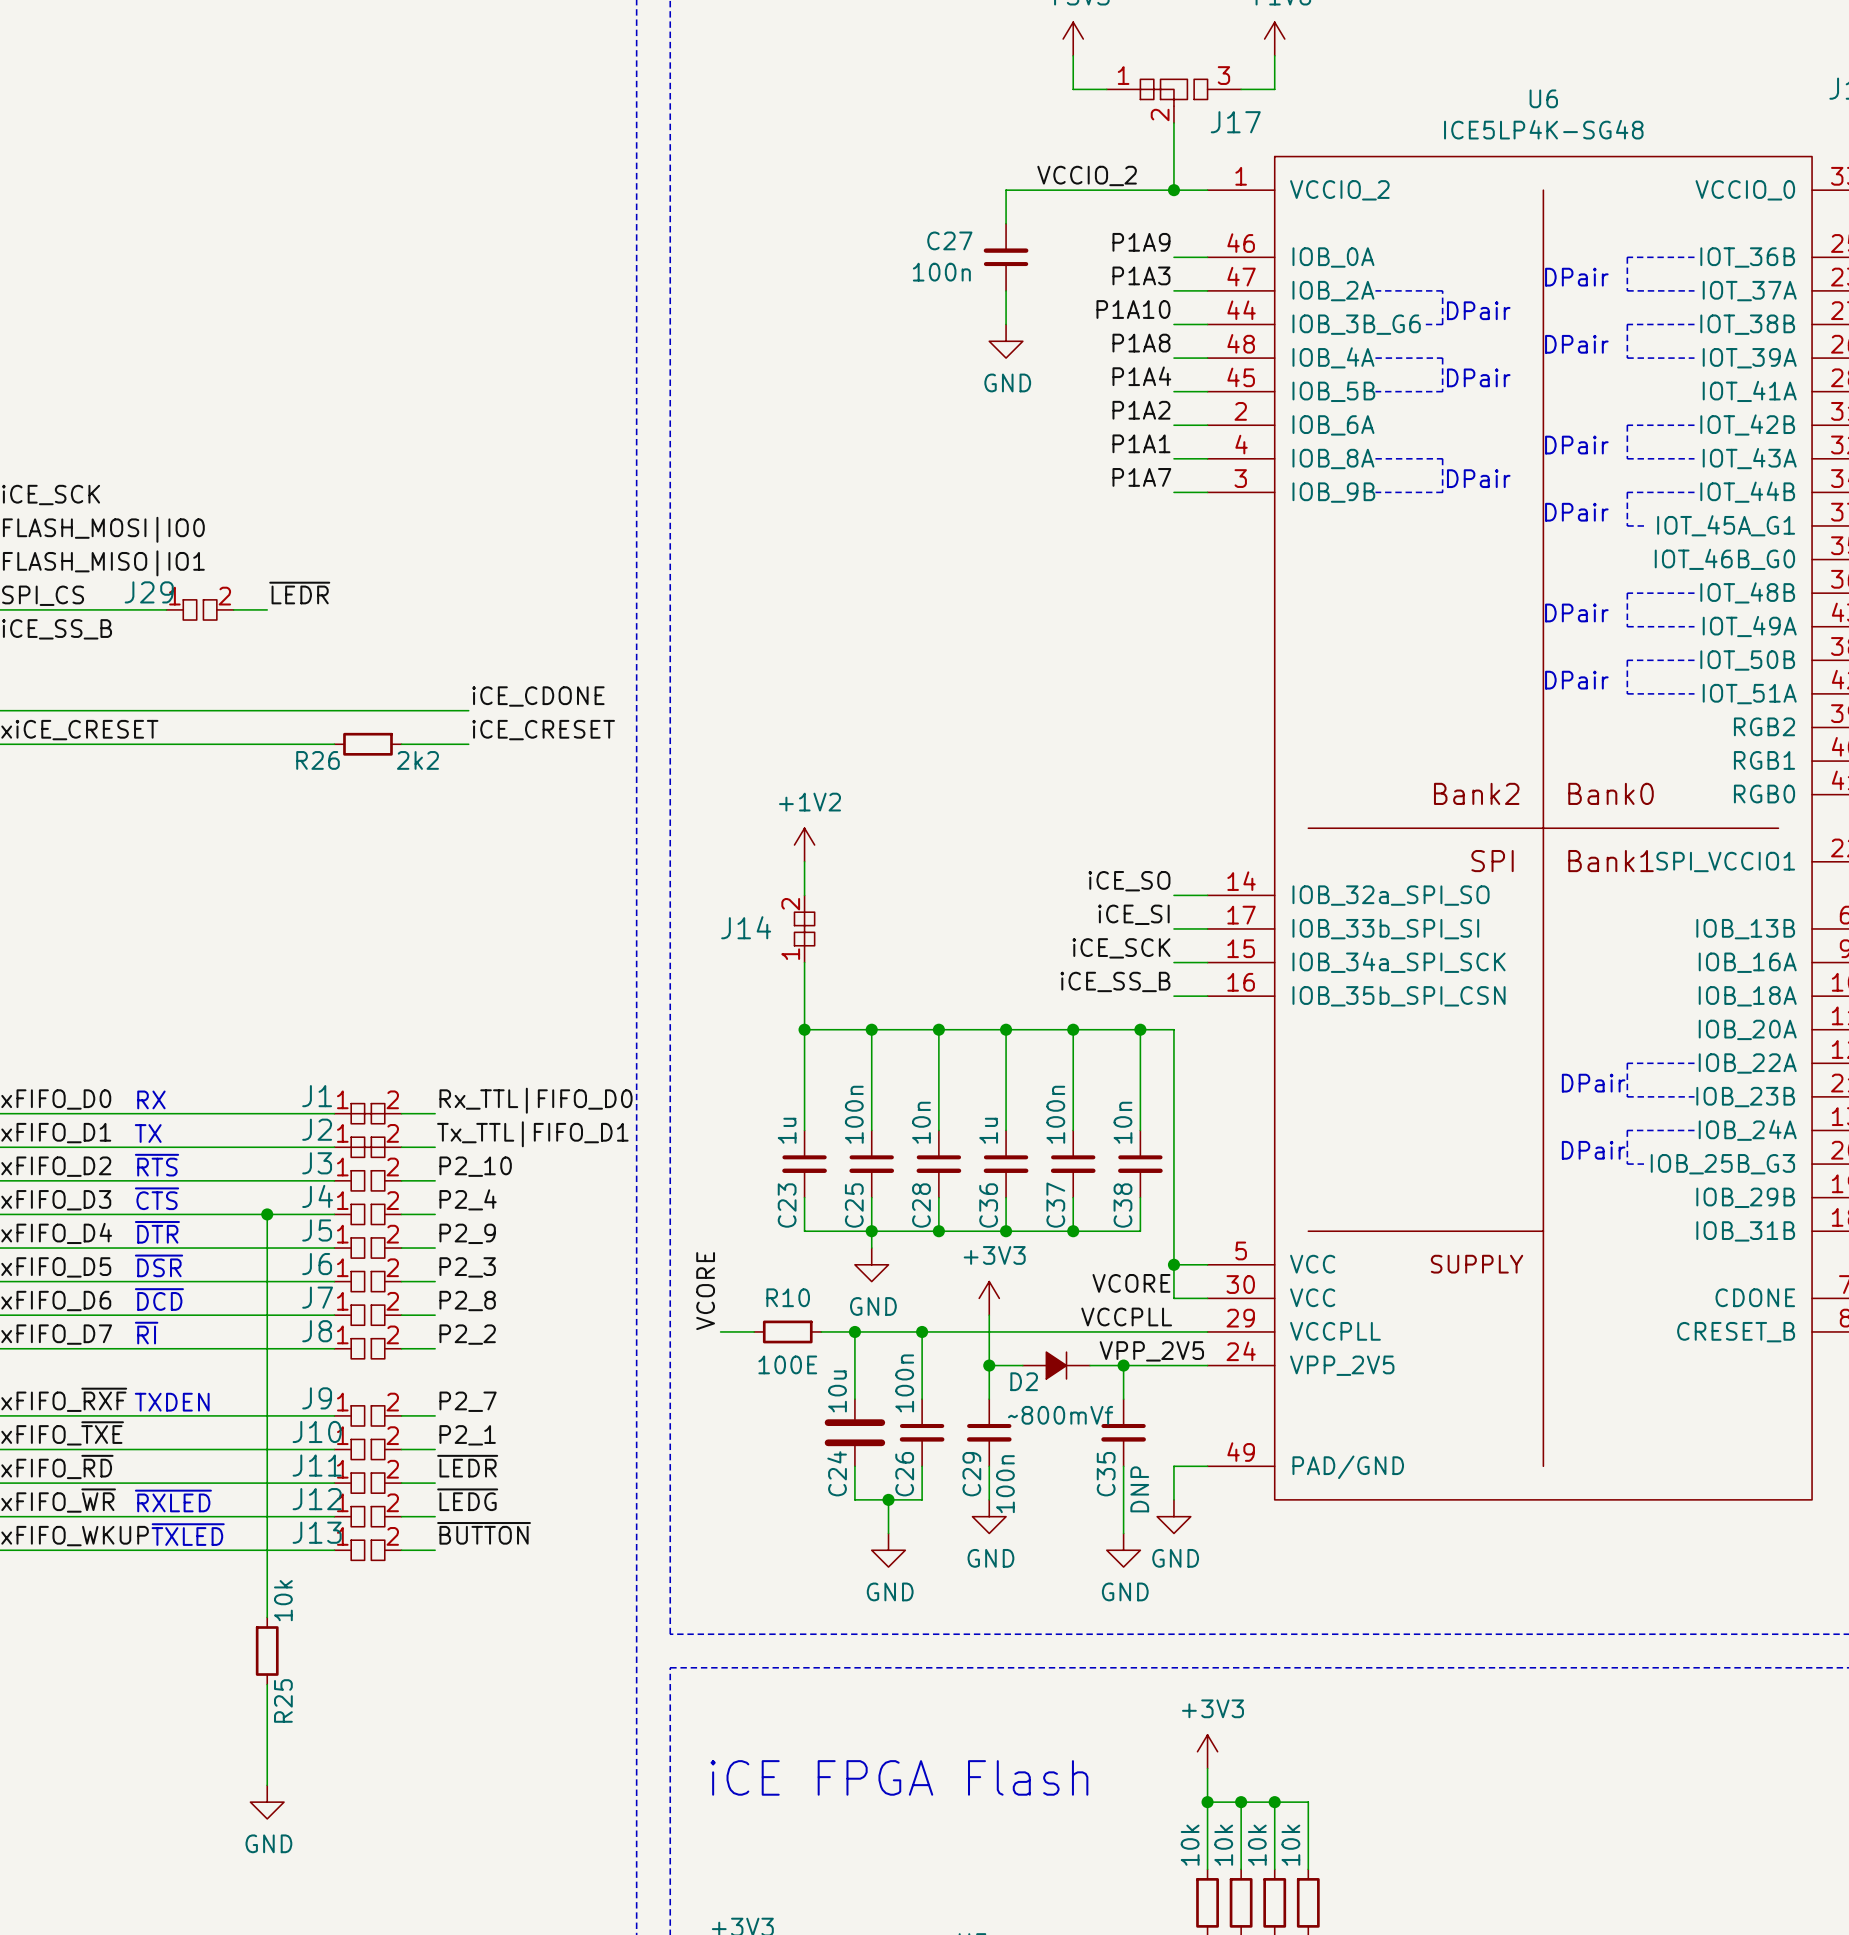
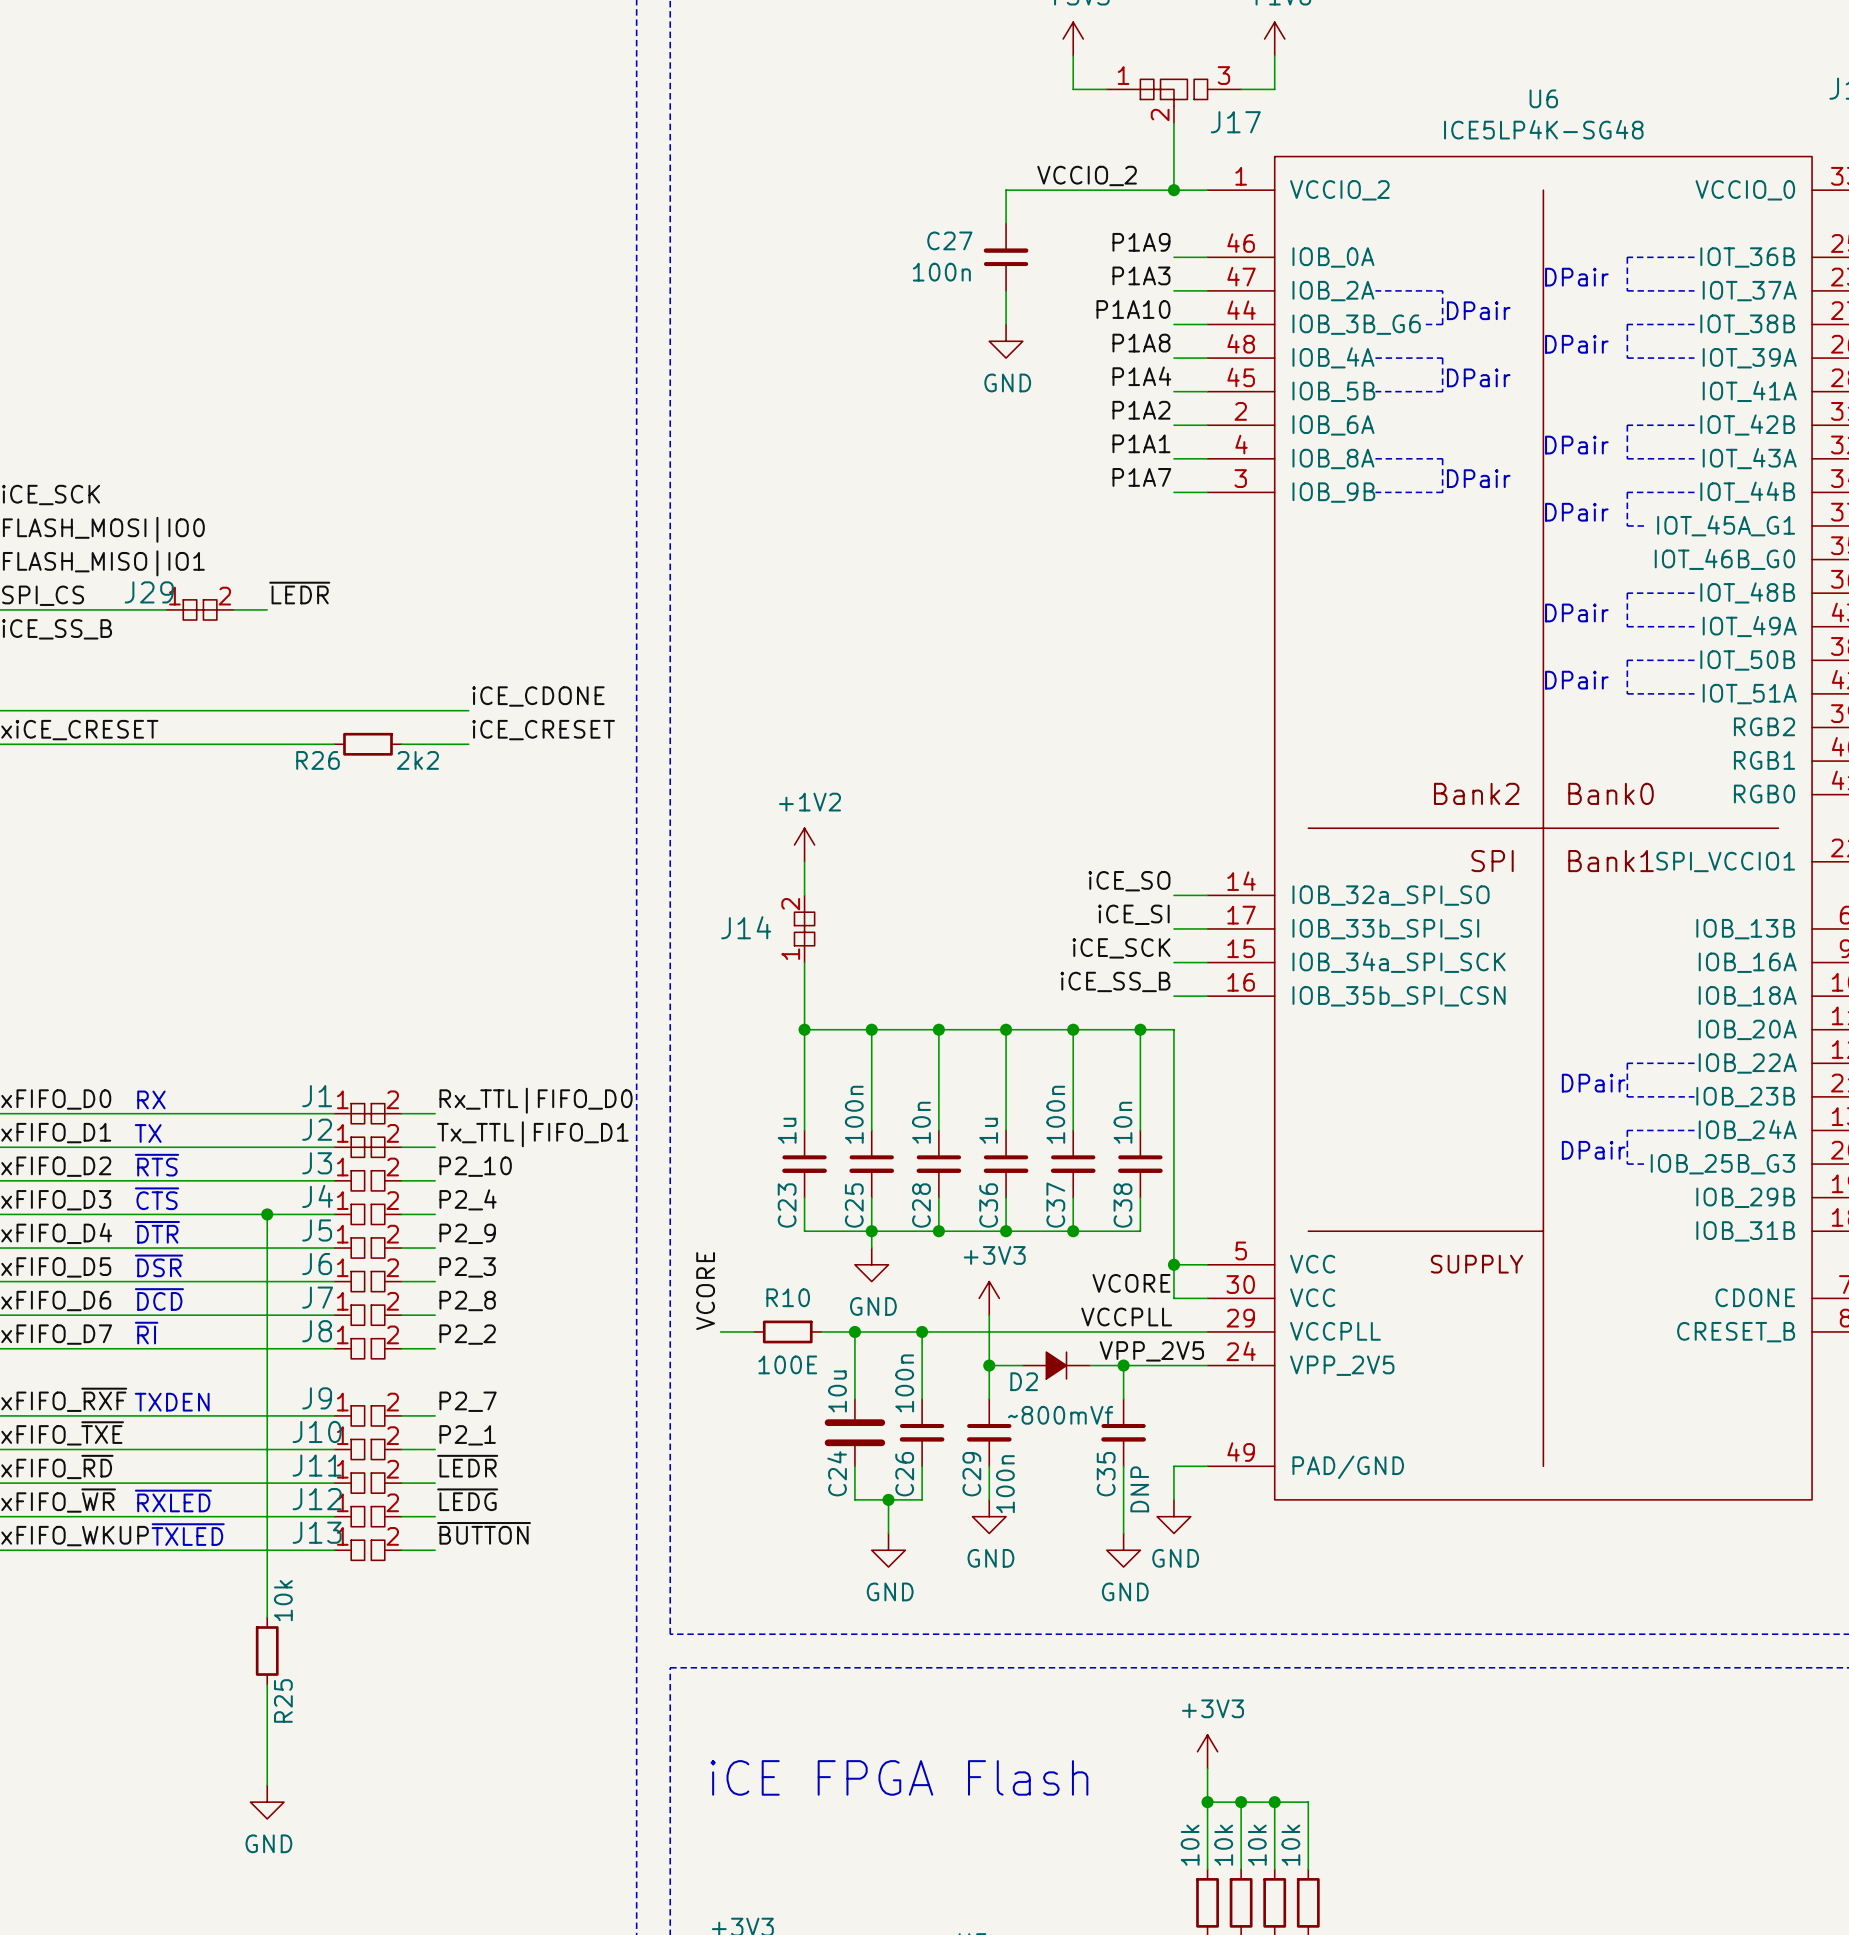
J29 symbol: [166, 599, 234, 621] -> [166, 599, 234, 621]

